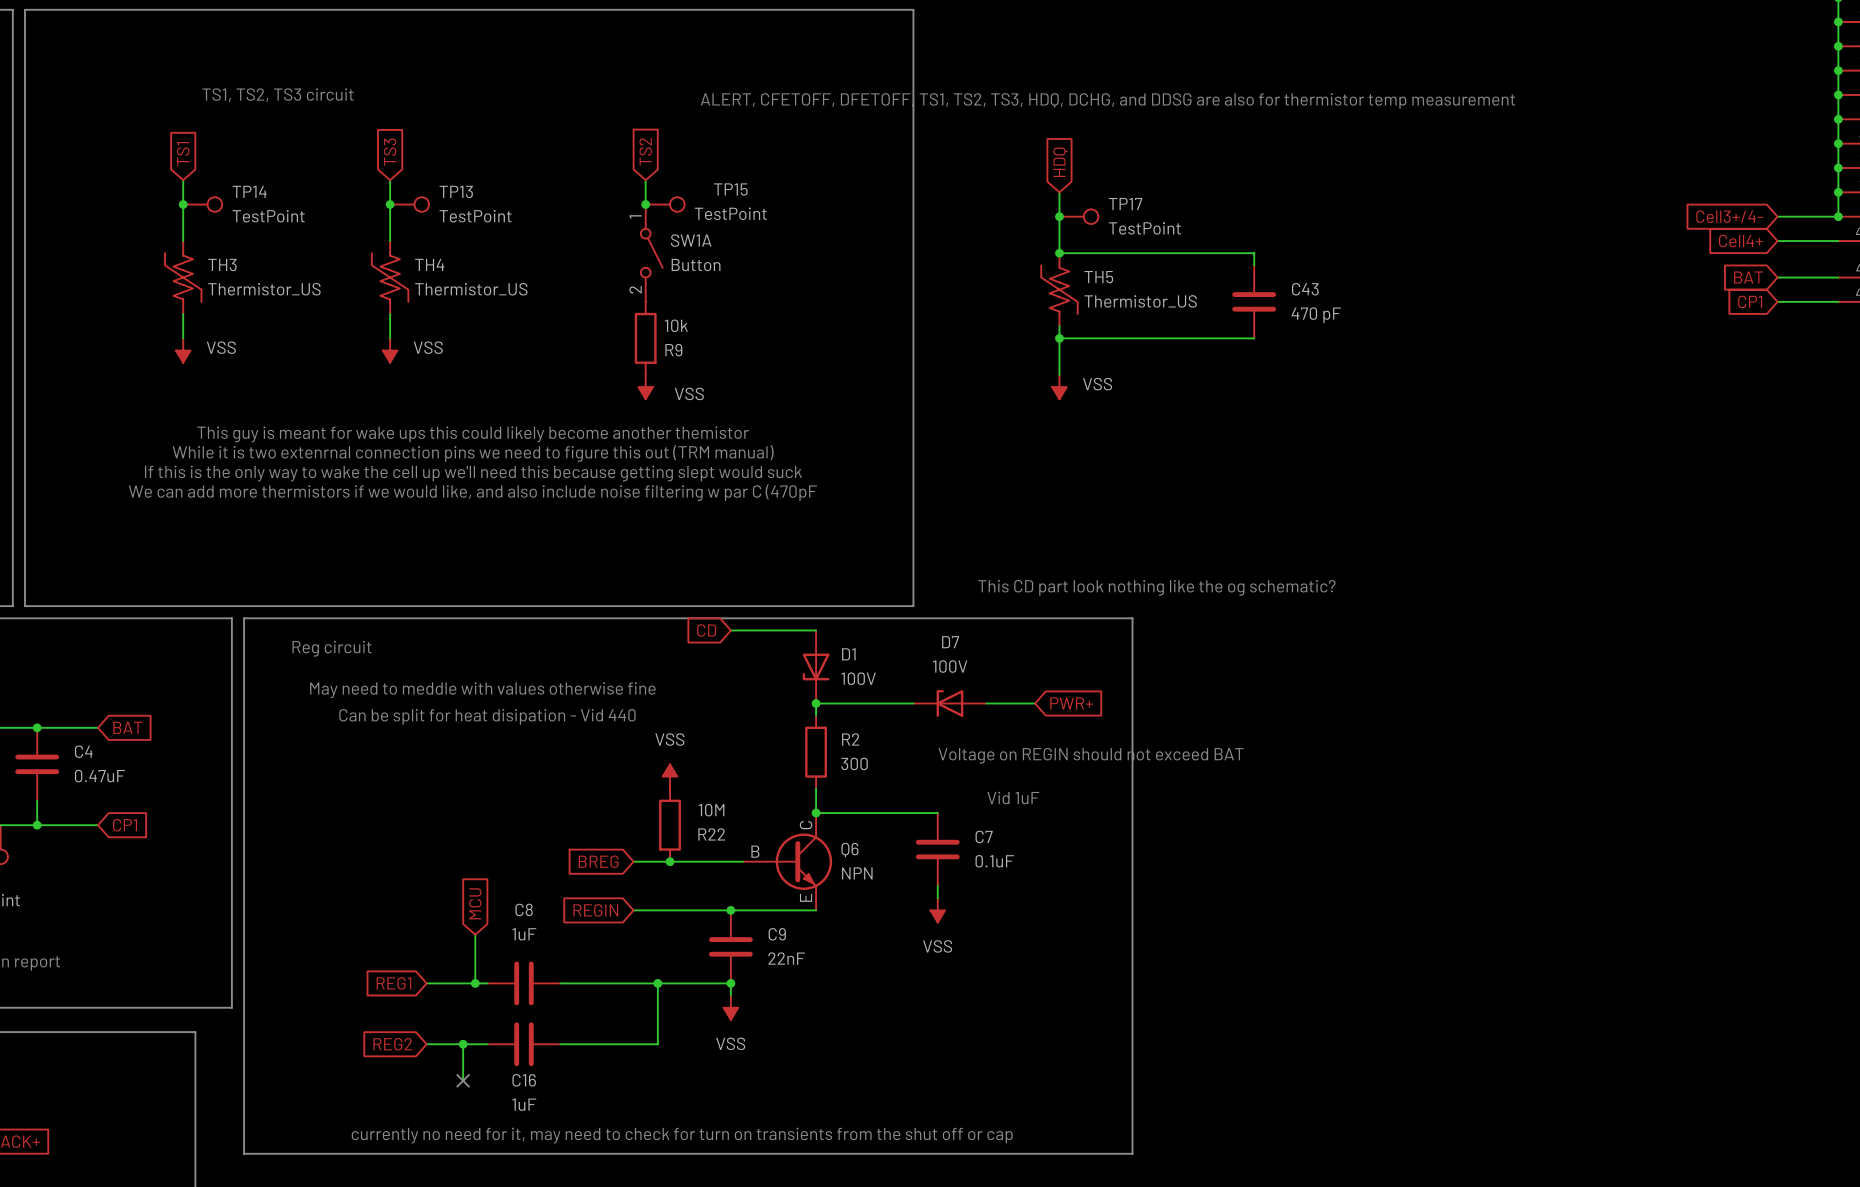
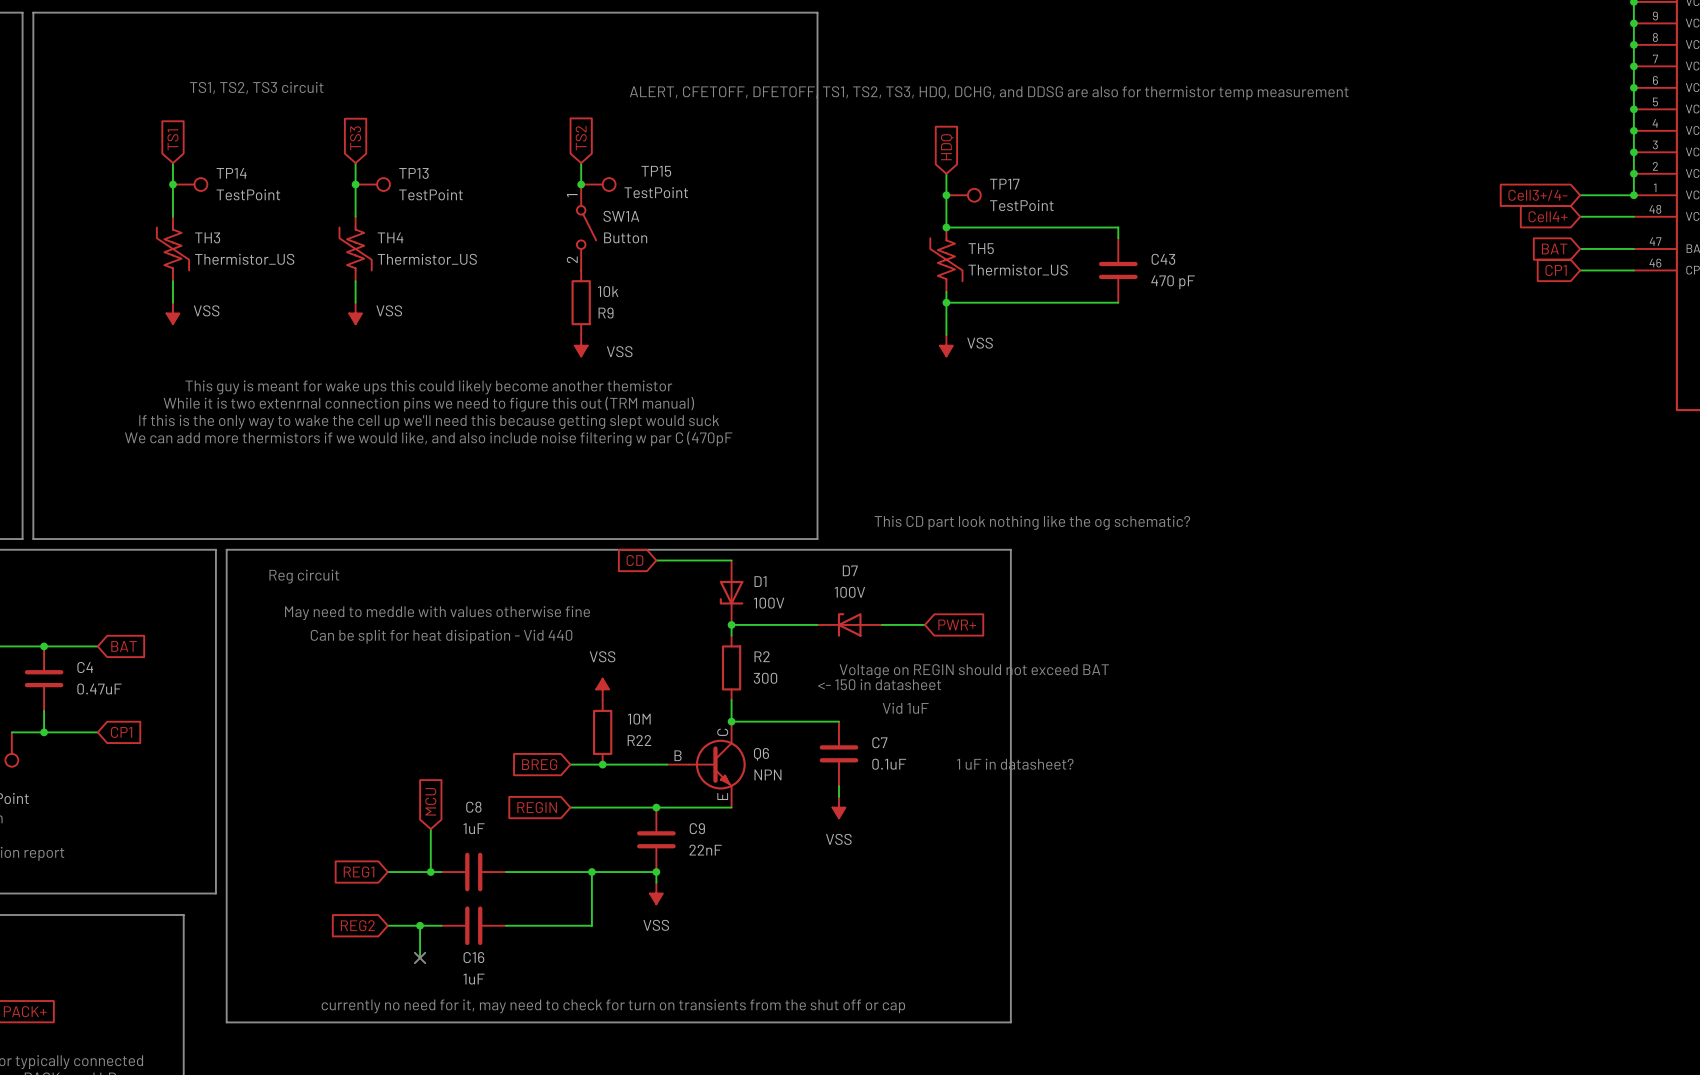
text: none -> <- 150 in datasheet (879, 684)
text: none -> 1 uF in datasheet? (1015, 764)

